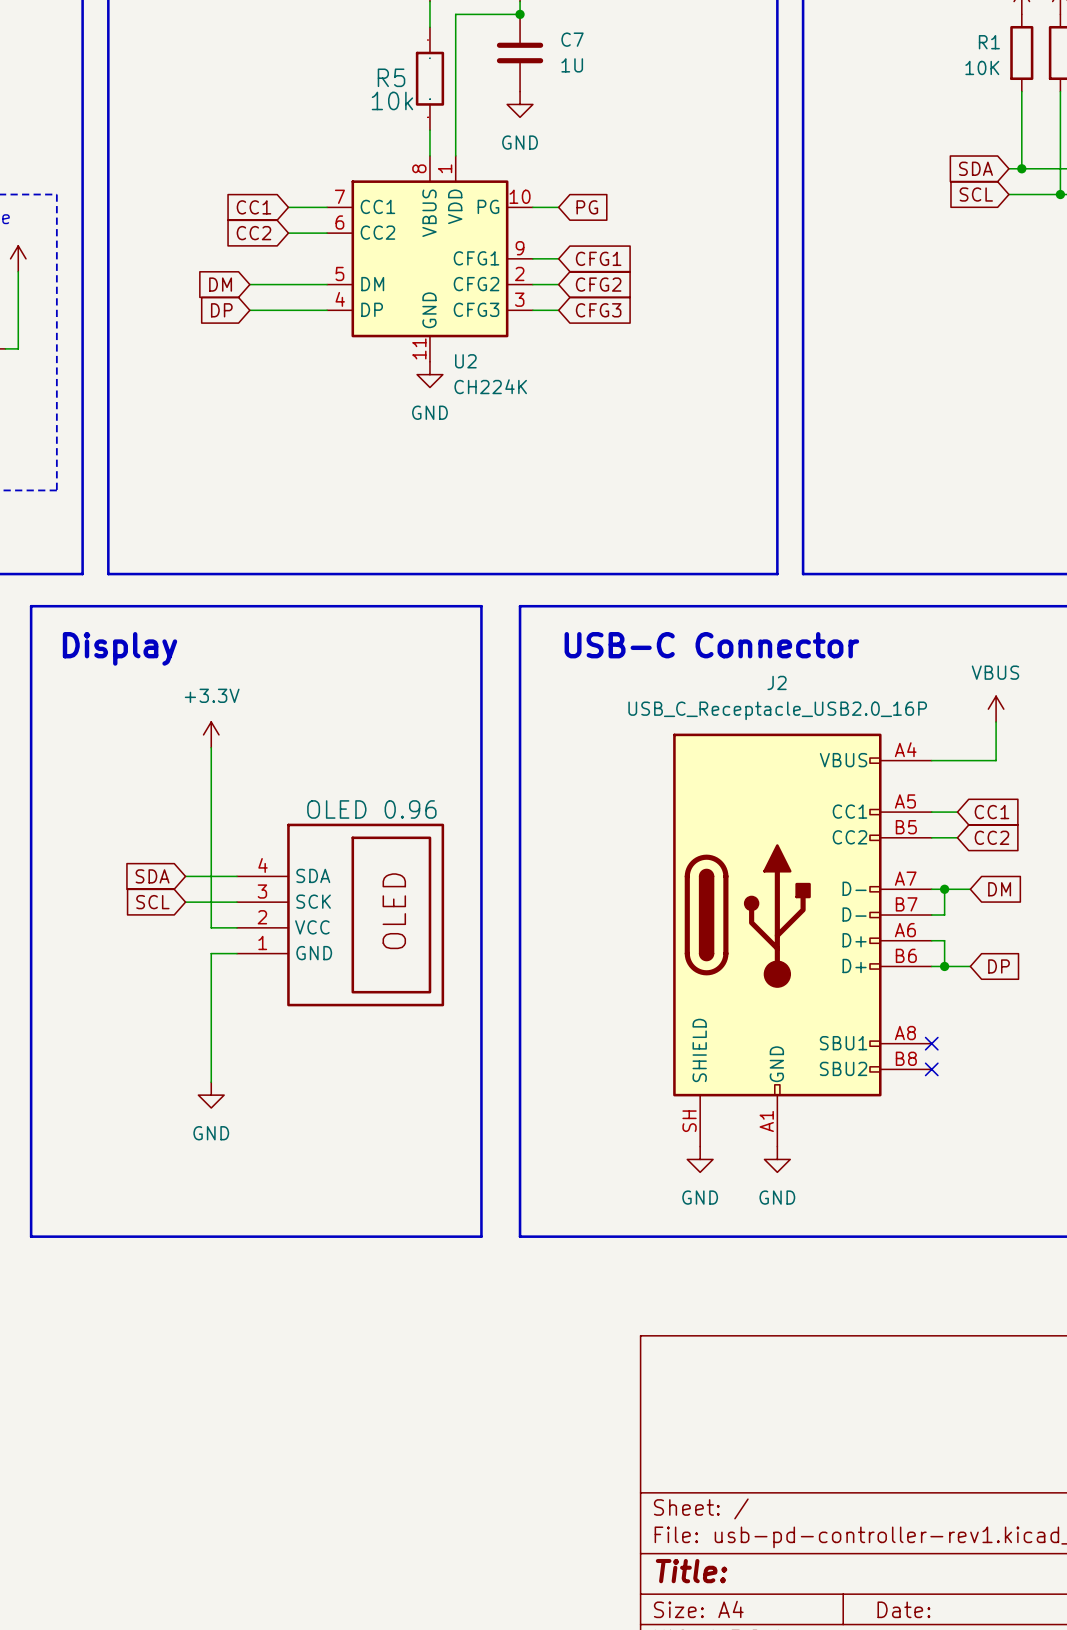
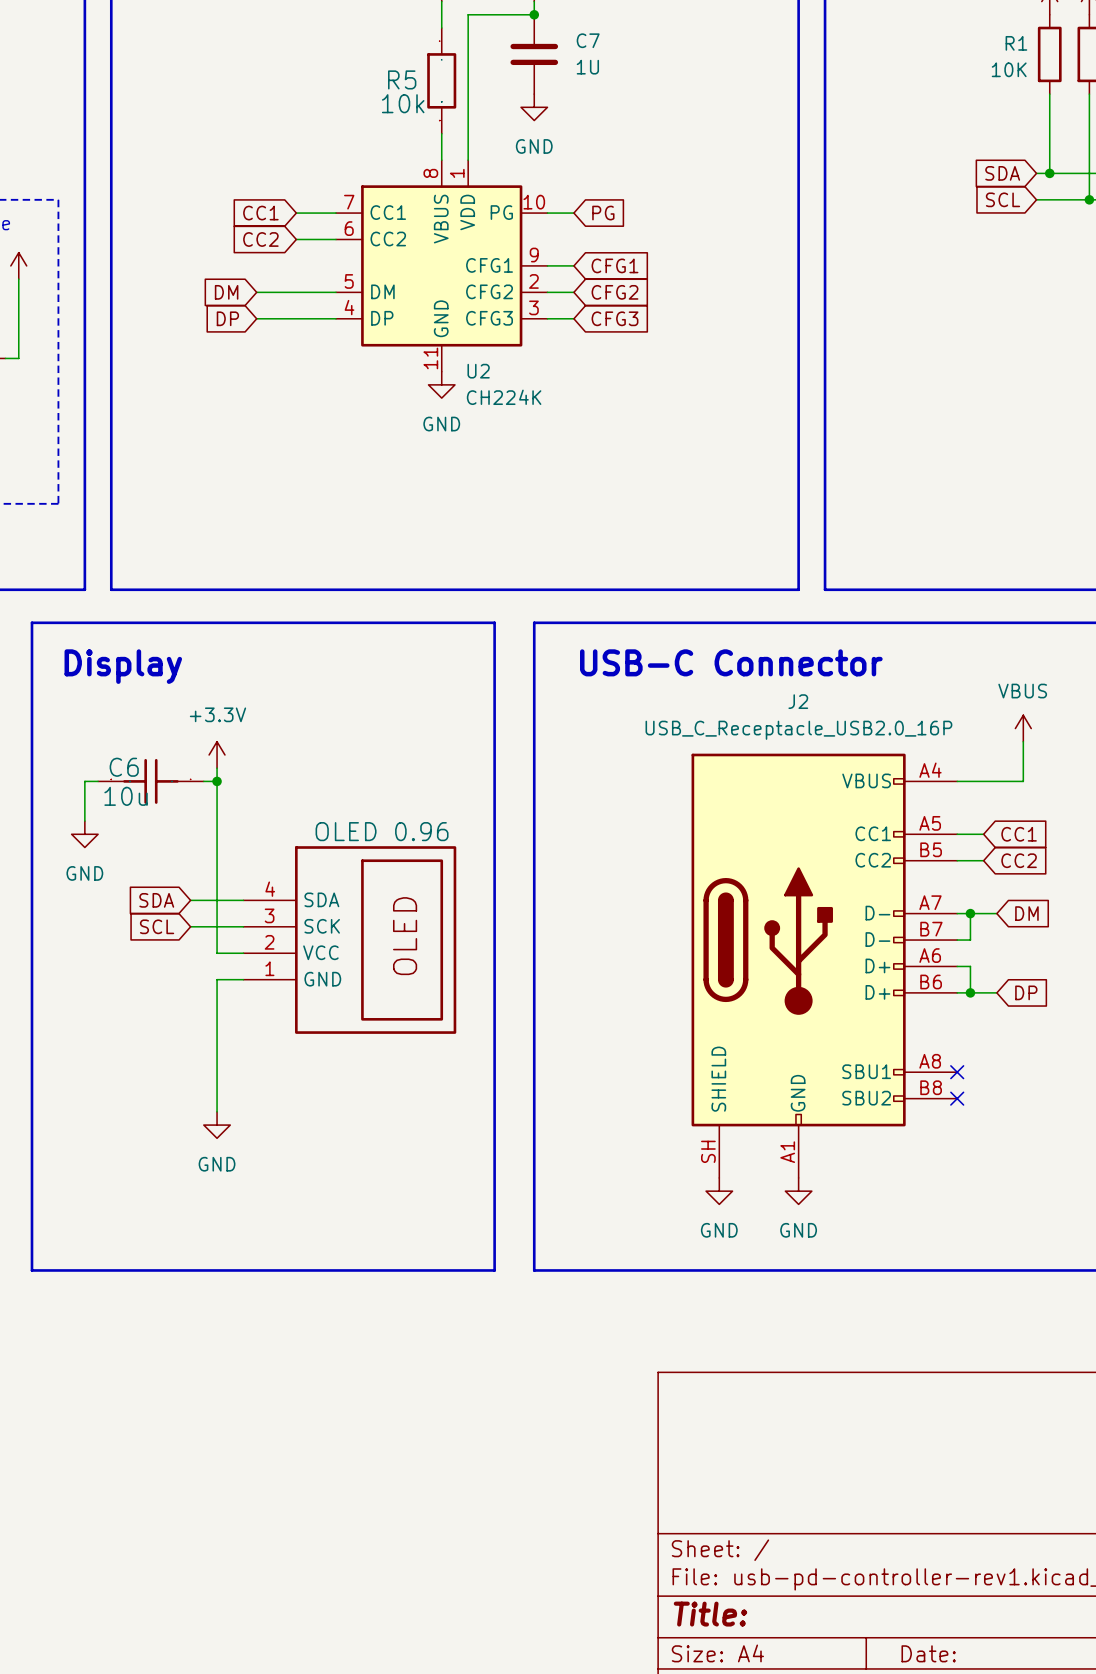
wire: none -> (98, 781) (84, 781) (84, 821)
C6: none -> 10u (150, 781)
wire: none -> (203, 781) (217, 781)
junction: none -> (217, 781)
power symbol: none -> GND (84, 834)

